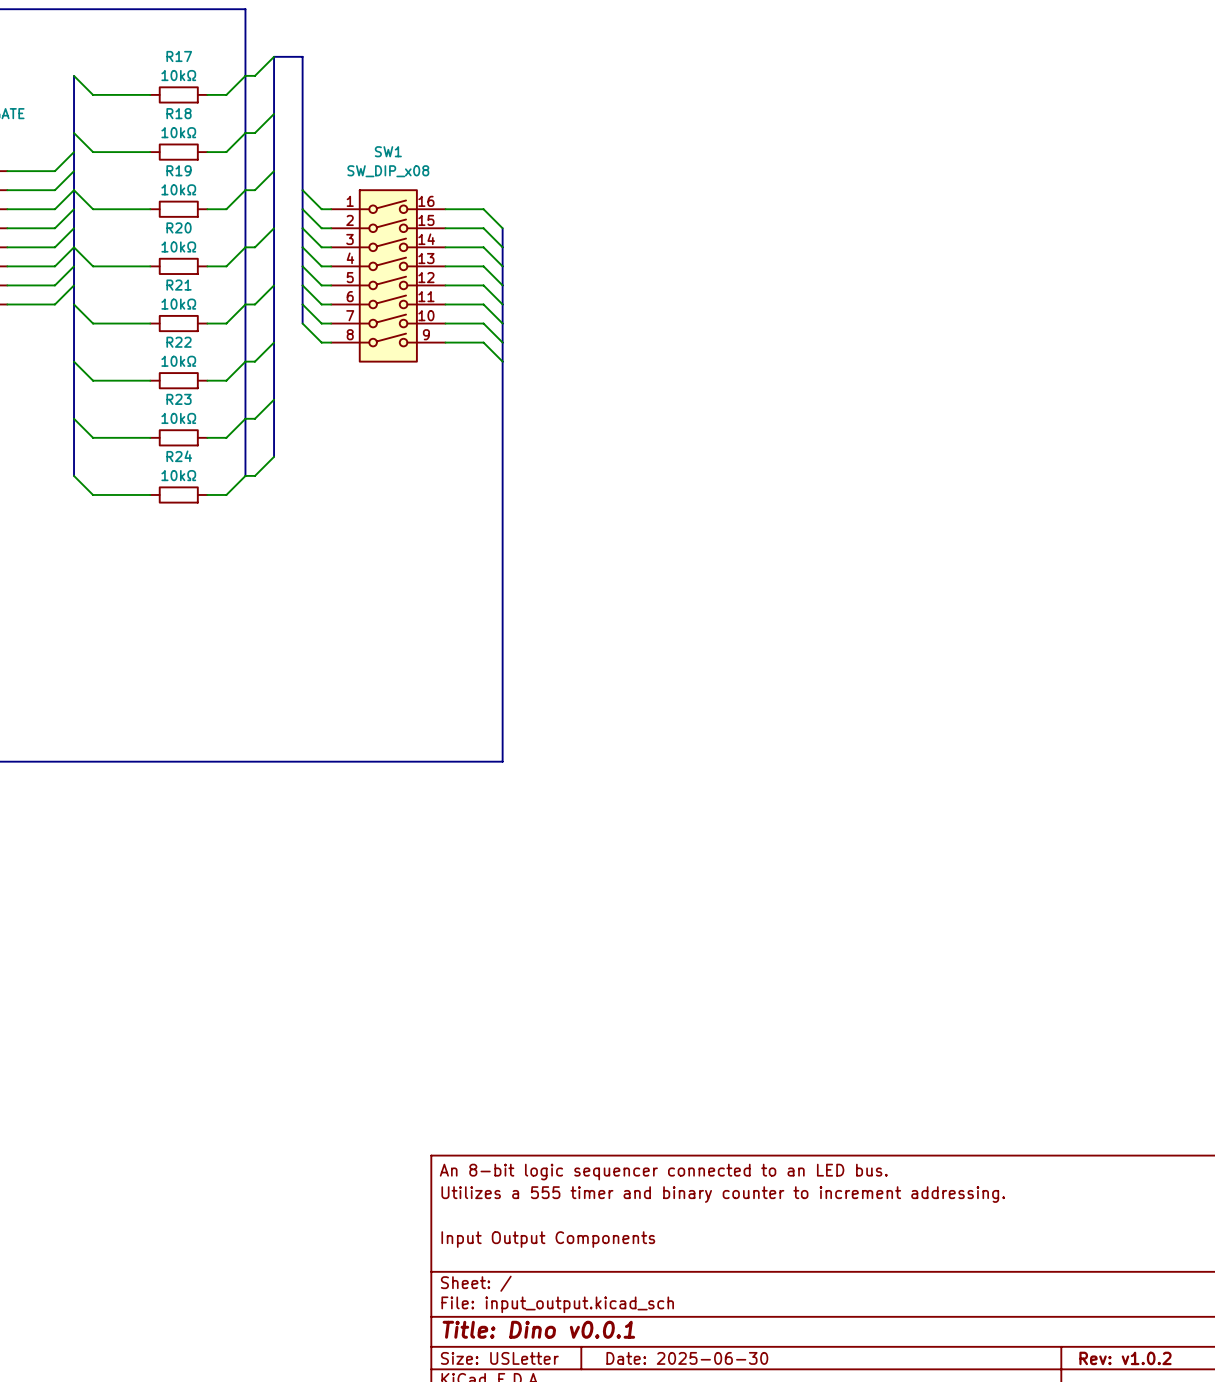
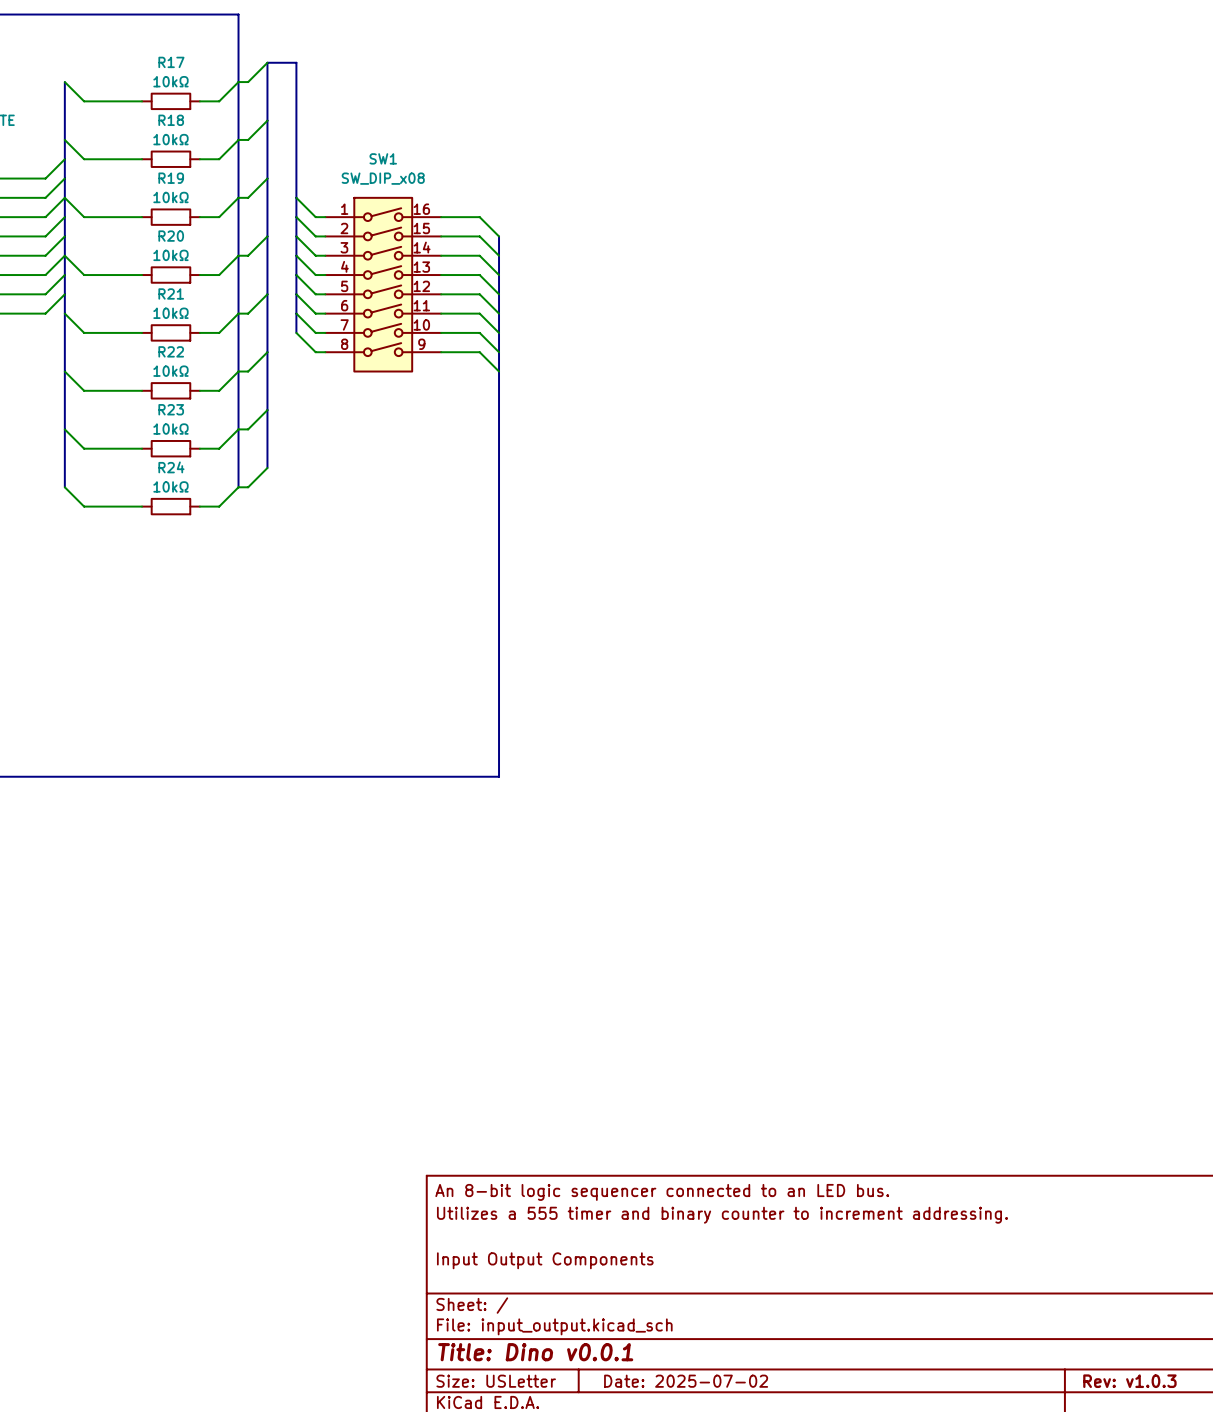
title block: Date: 2025-06-30 (687, 1358) -> Date: 2025-07-02 (686, 1381)
title block: Rev: v1.0.2 (1125, 1358) -> Rev: v1.0.3 (1129, 1381)

